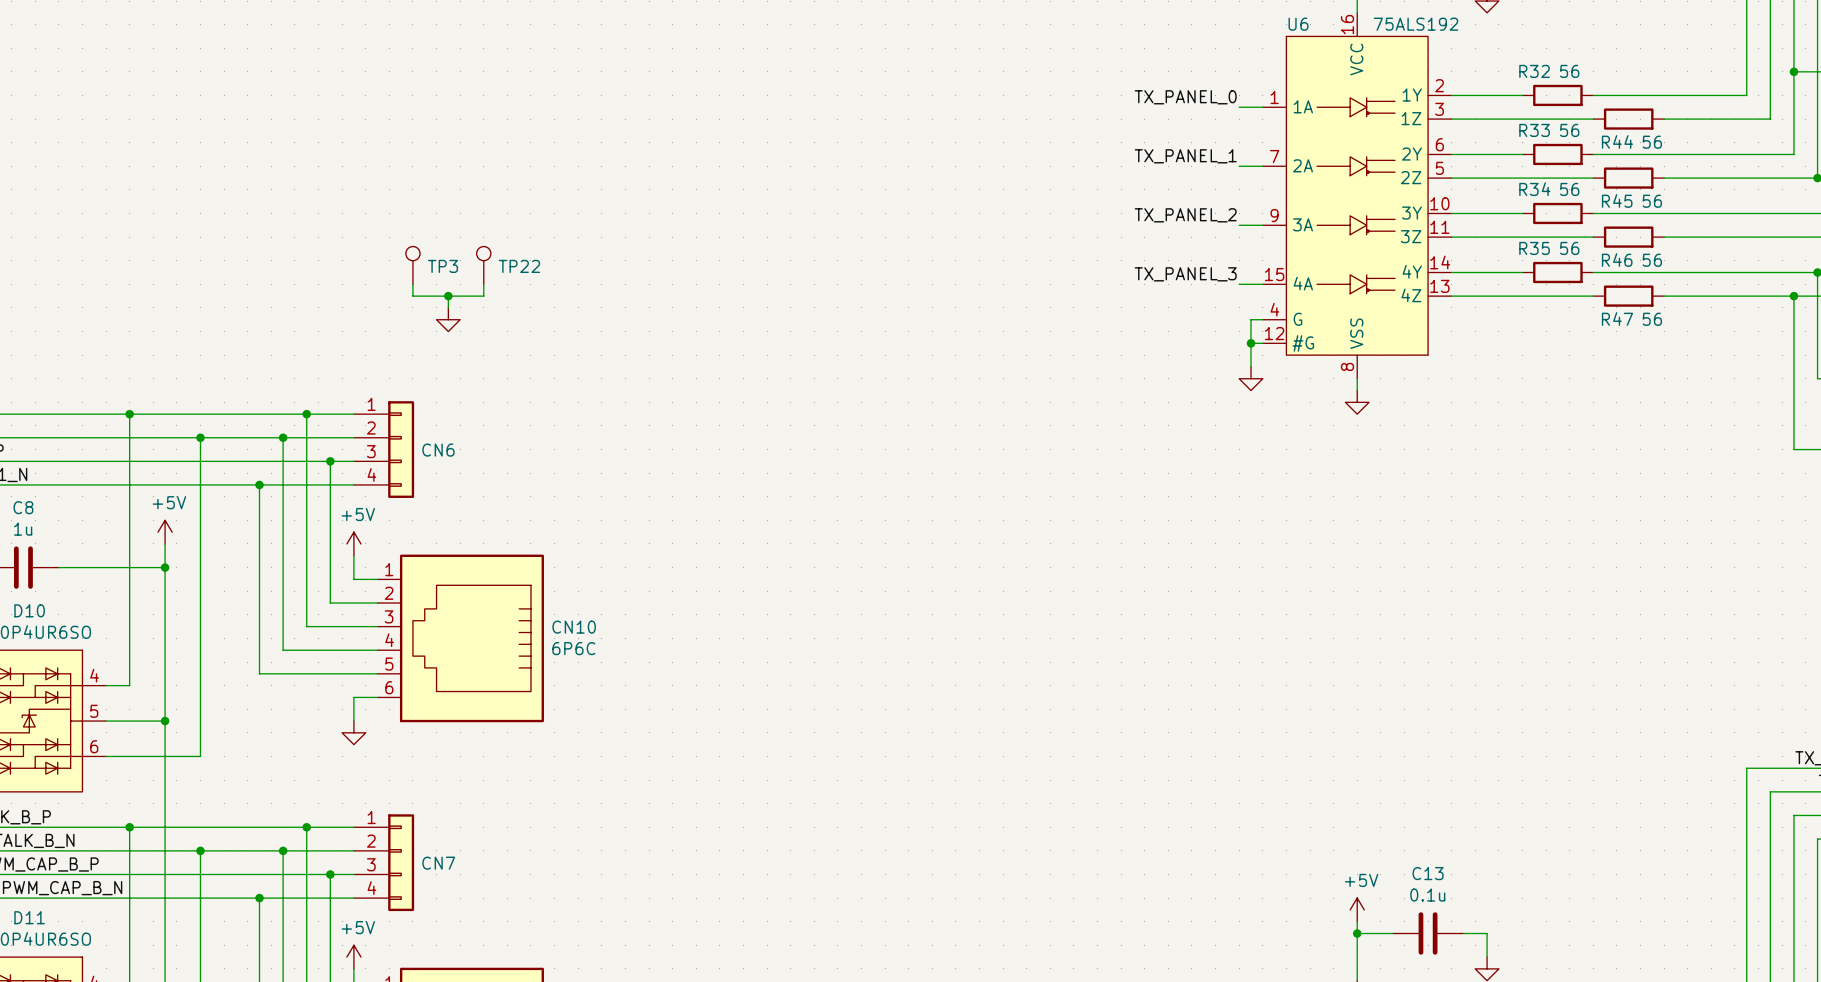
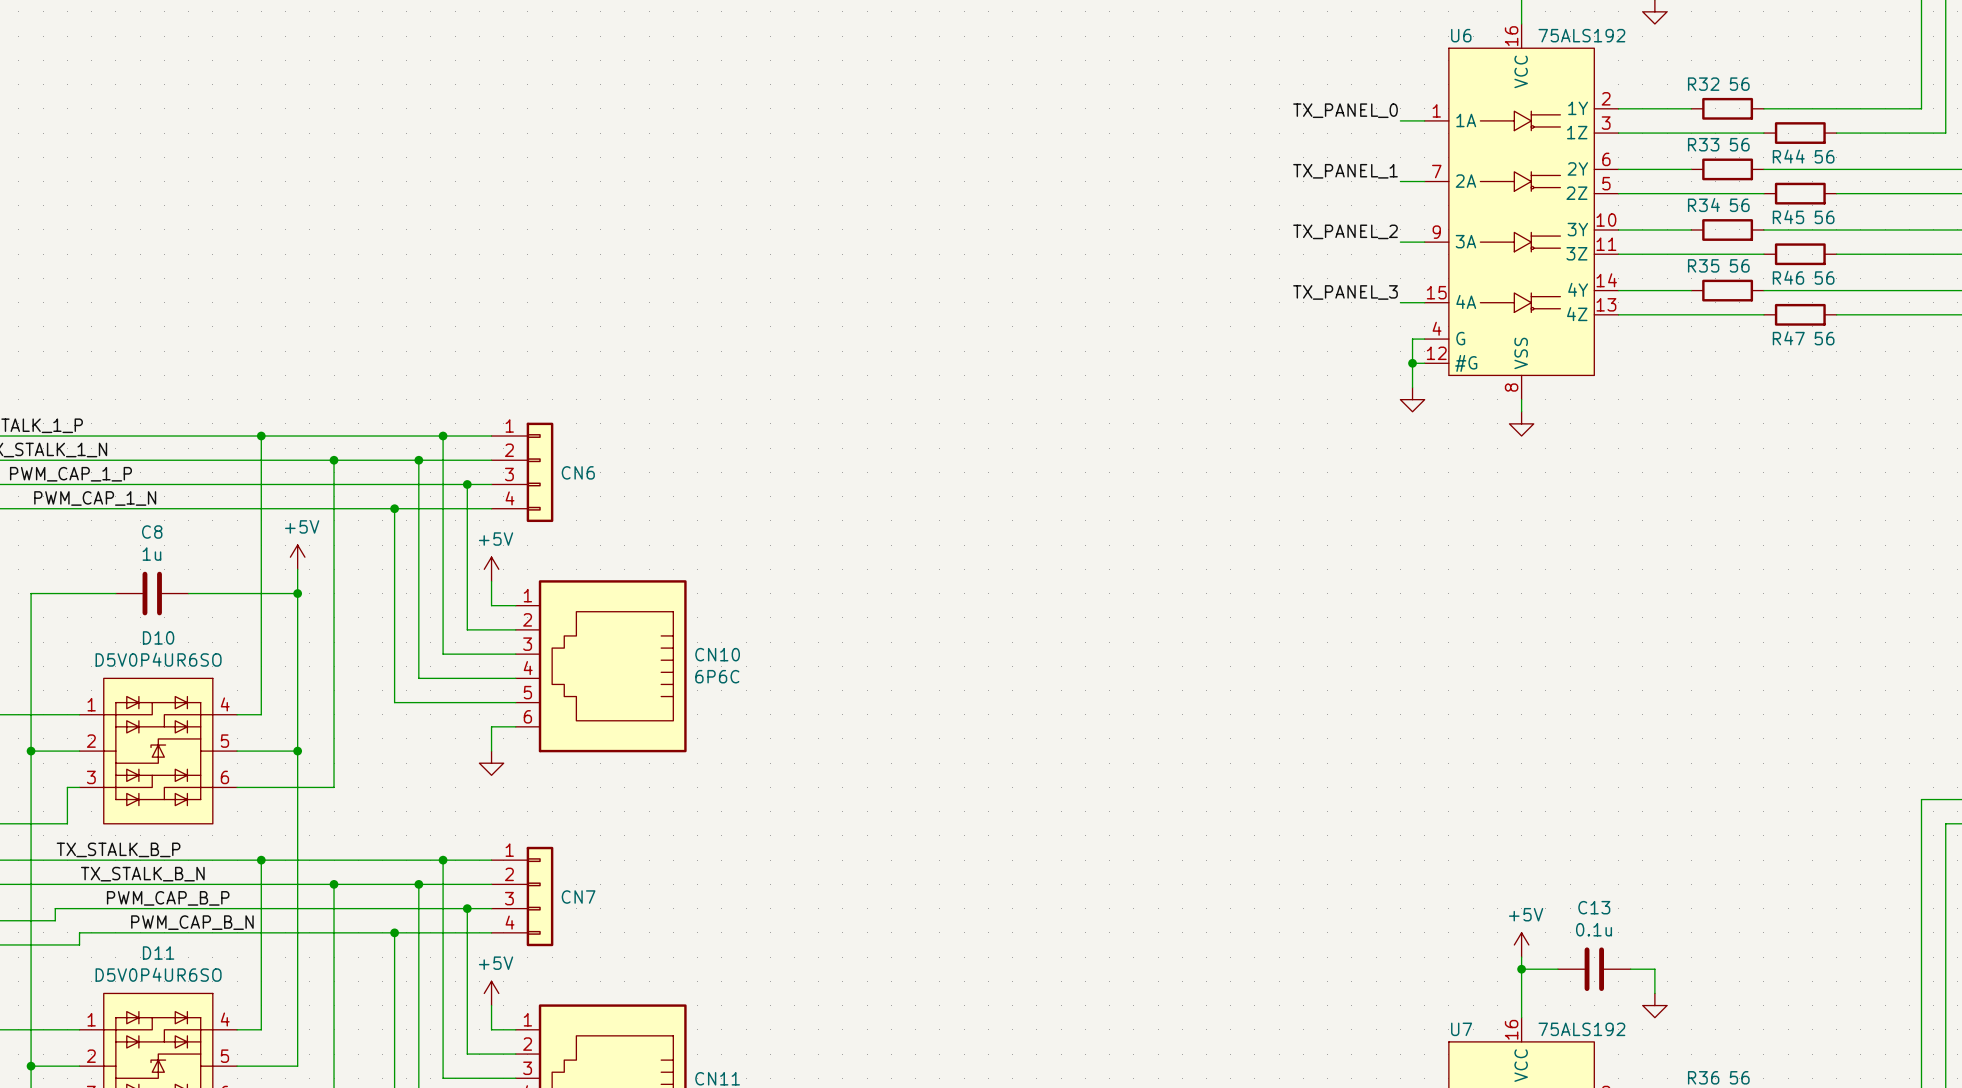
TP3: (412, 265) -> none
TP22: (483, 265) -> none
wire: (412, 284) (412, 296) (483, 296) (483, 284) -> none
wire: (448, 296) (448, 307) -> none
junction: (448, 296) -> none
power symbol: (448, 319) -> none

